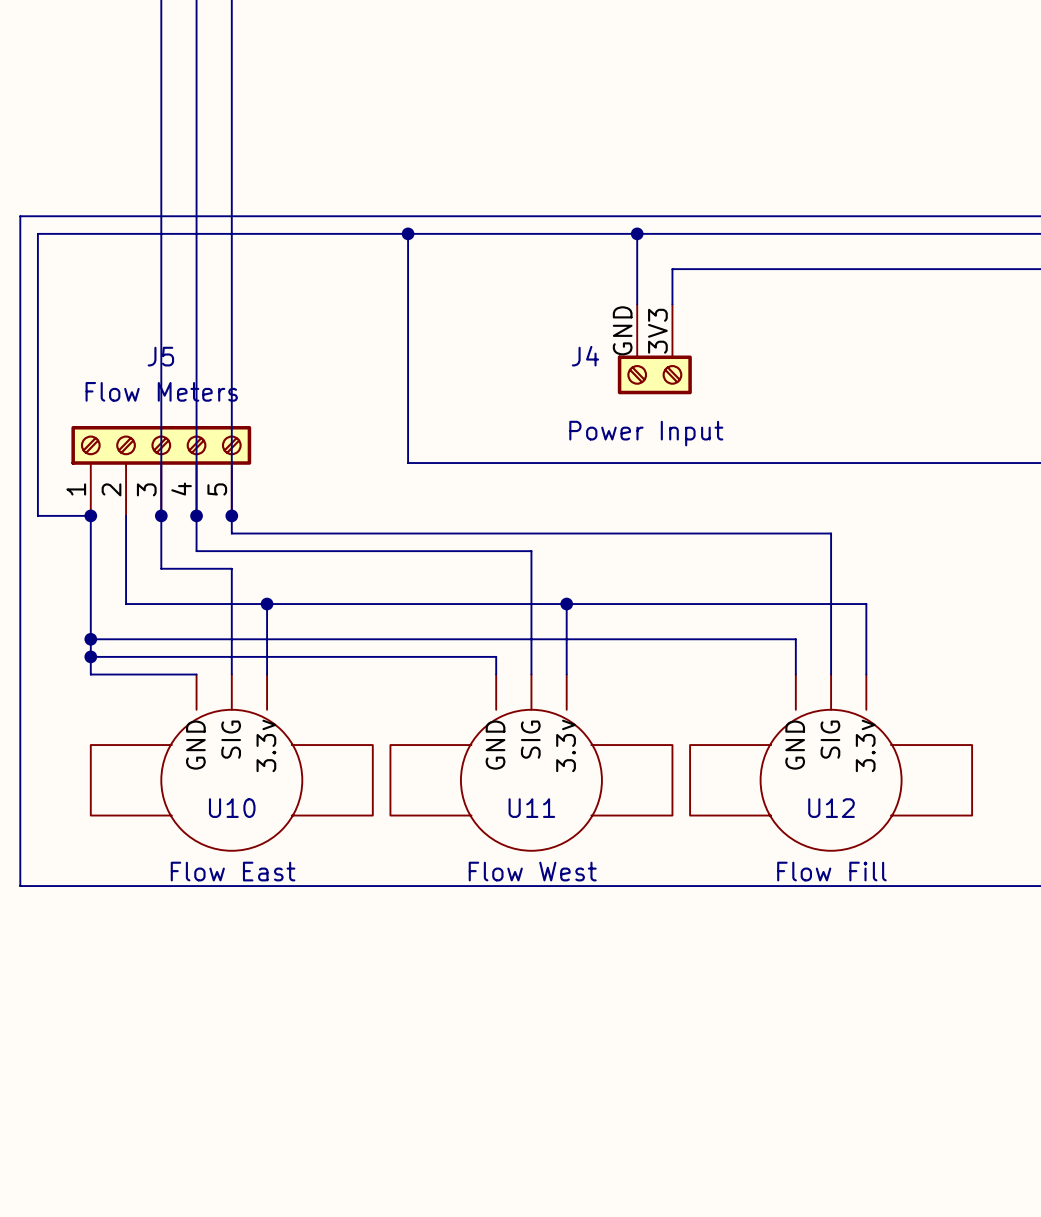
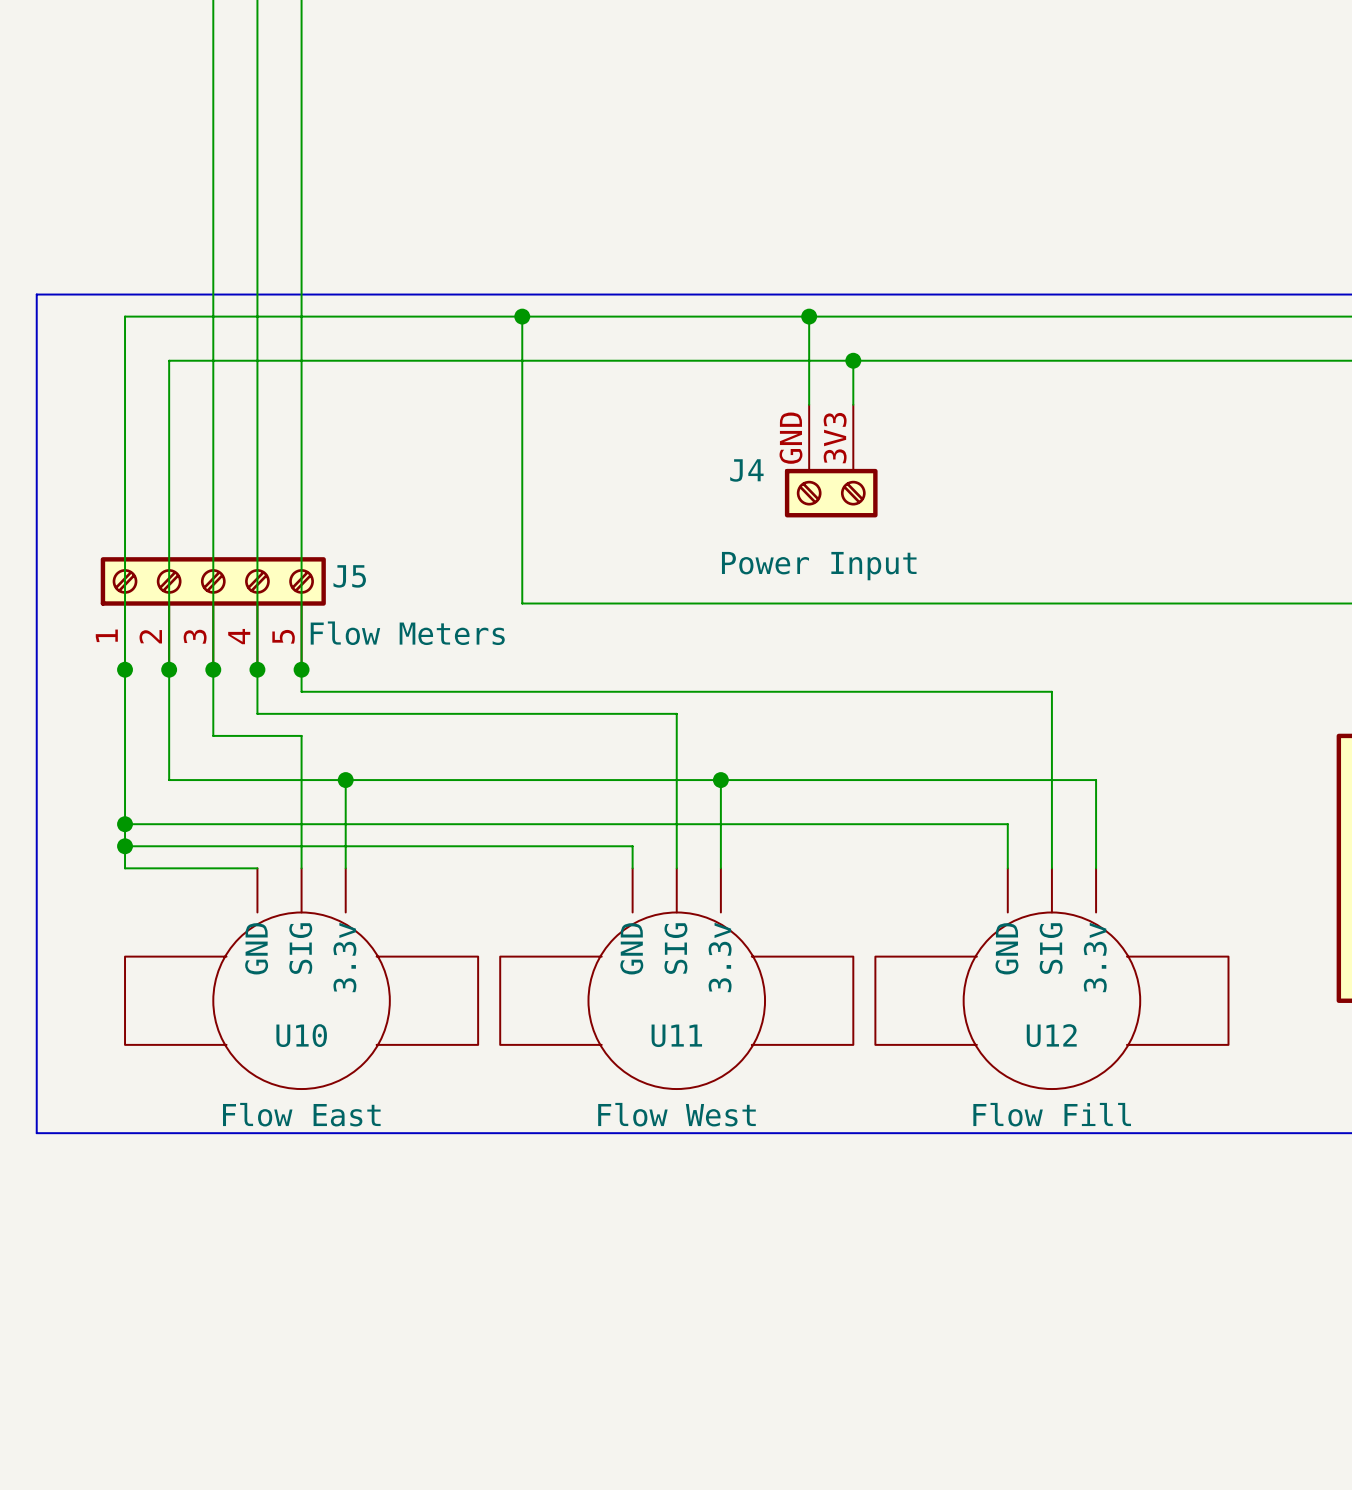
wire: (90, 233) (37, 233) (37, 515) (90, 515) -> (125, 316) (125, 669)
wire: none -> (853, 360) (169, 360) (169, 669)
junction: none -> (853, 360)
J5 name position: J5 (160, 356) -> J5 (349, 576)
J5 value position: Flow Meters (161, 391) -> Flow Meters (407, 633)
junction: none -> (169, 669)

